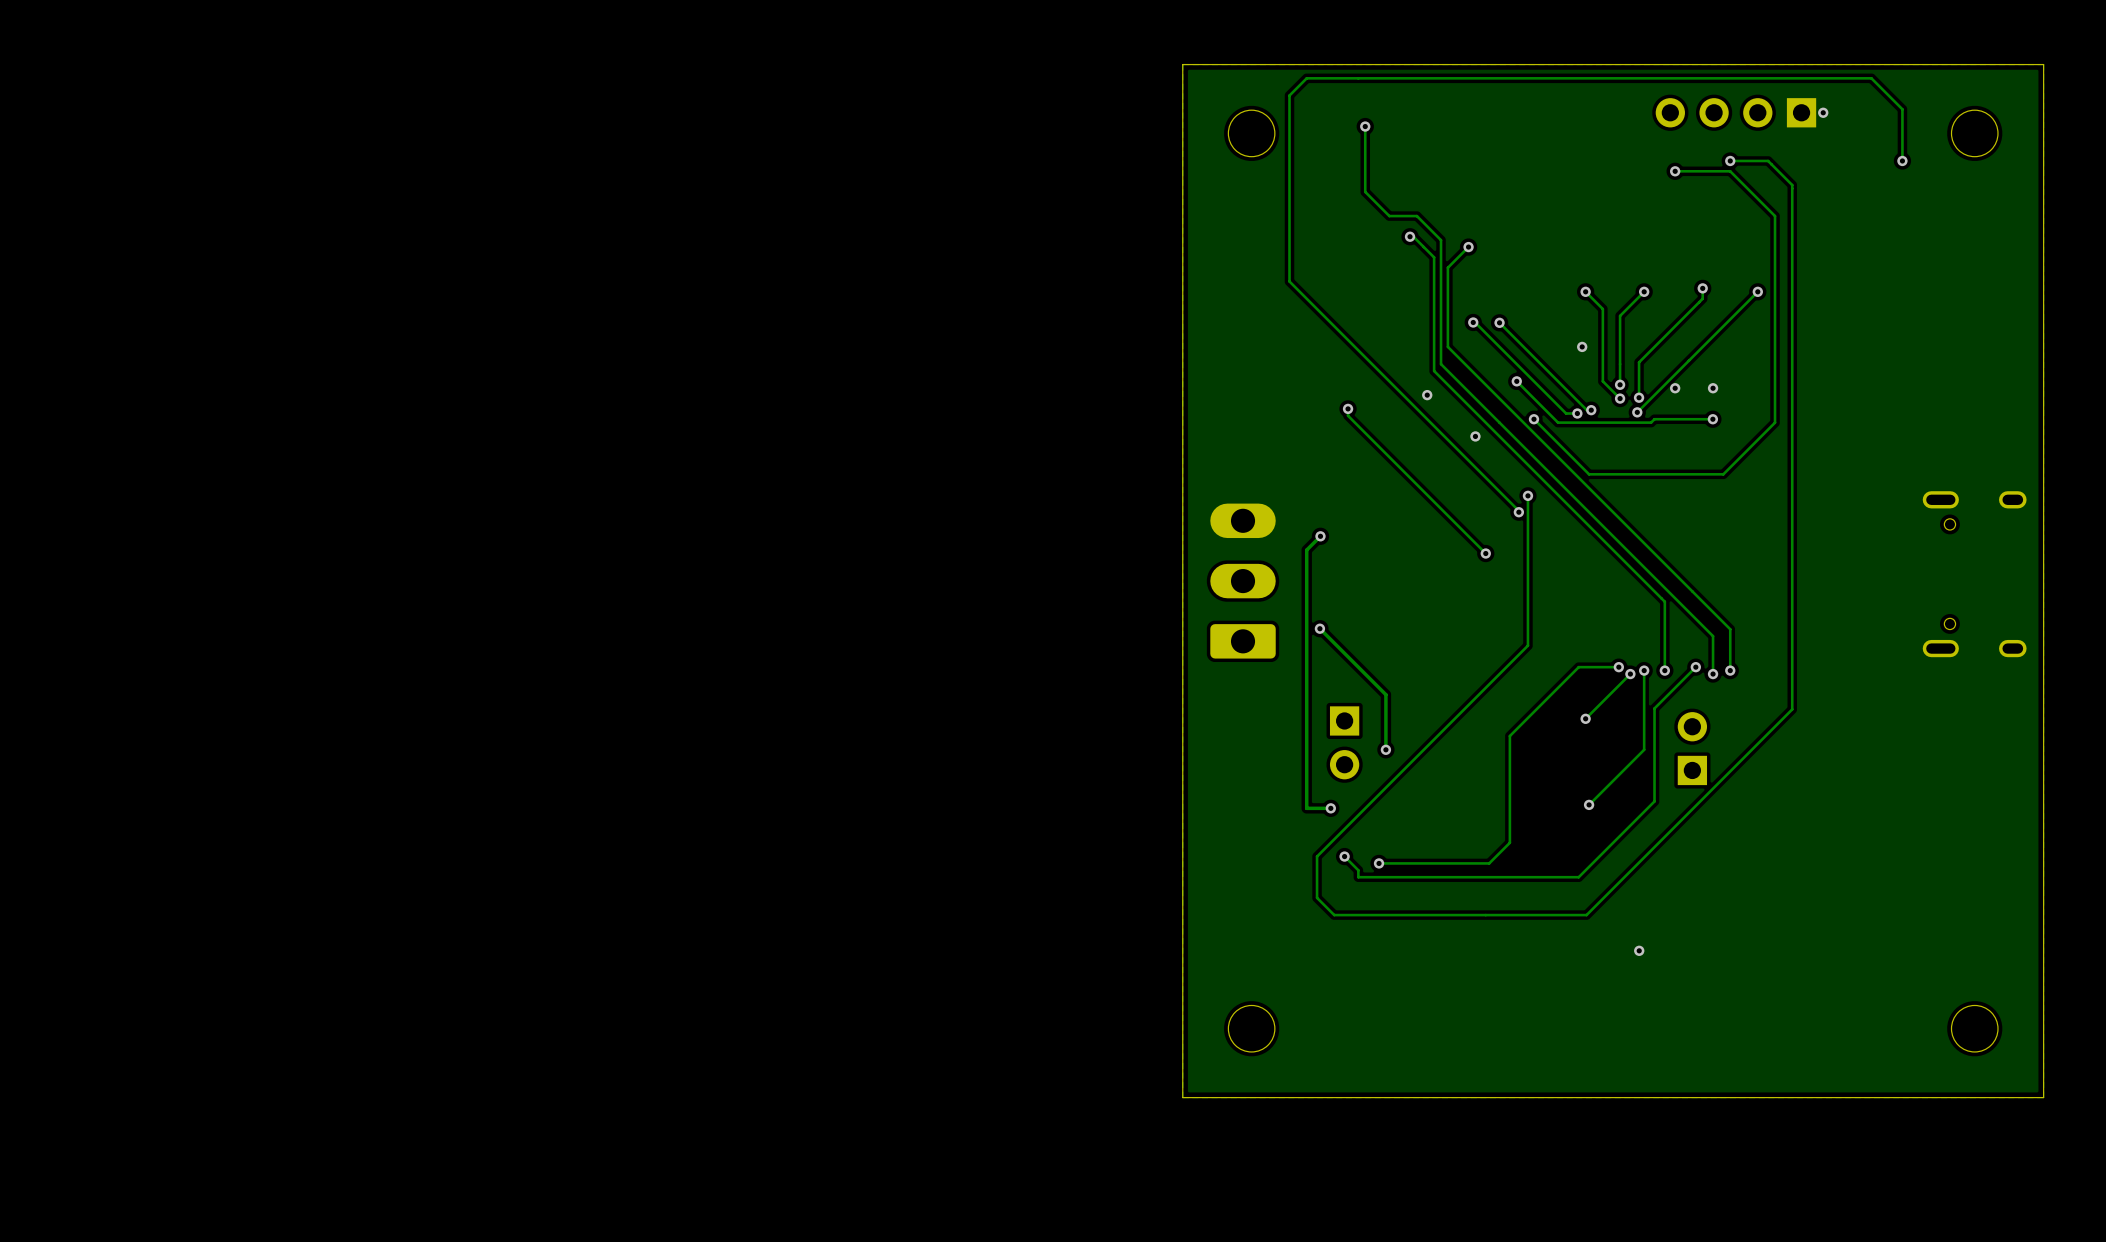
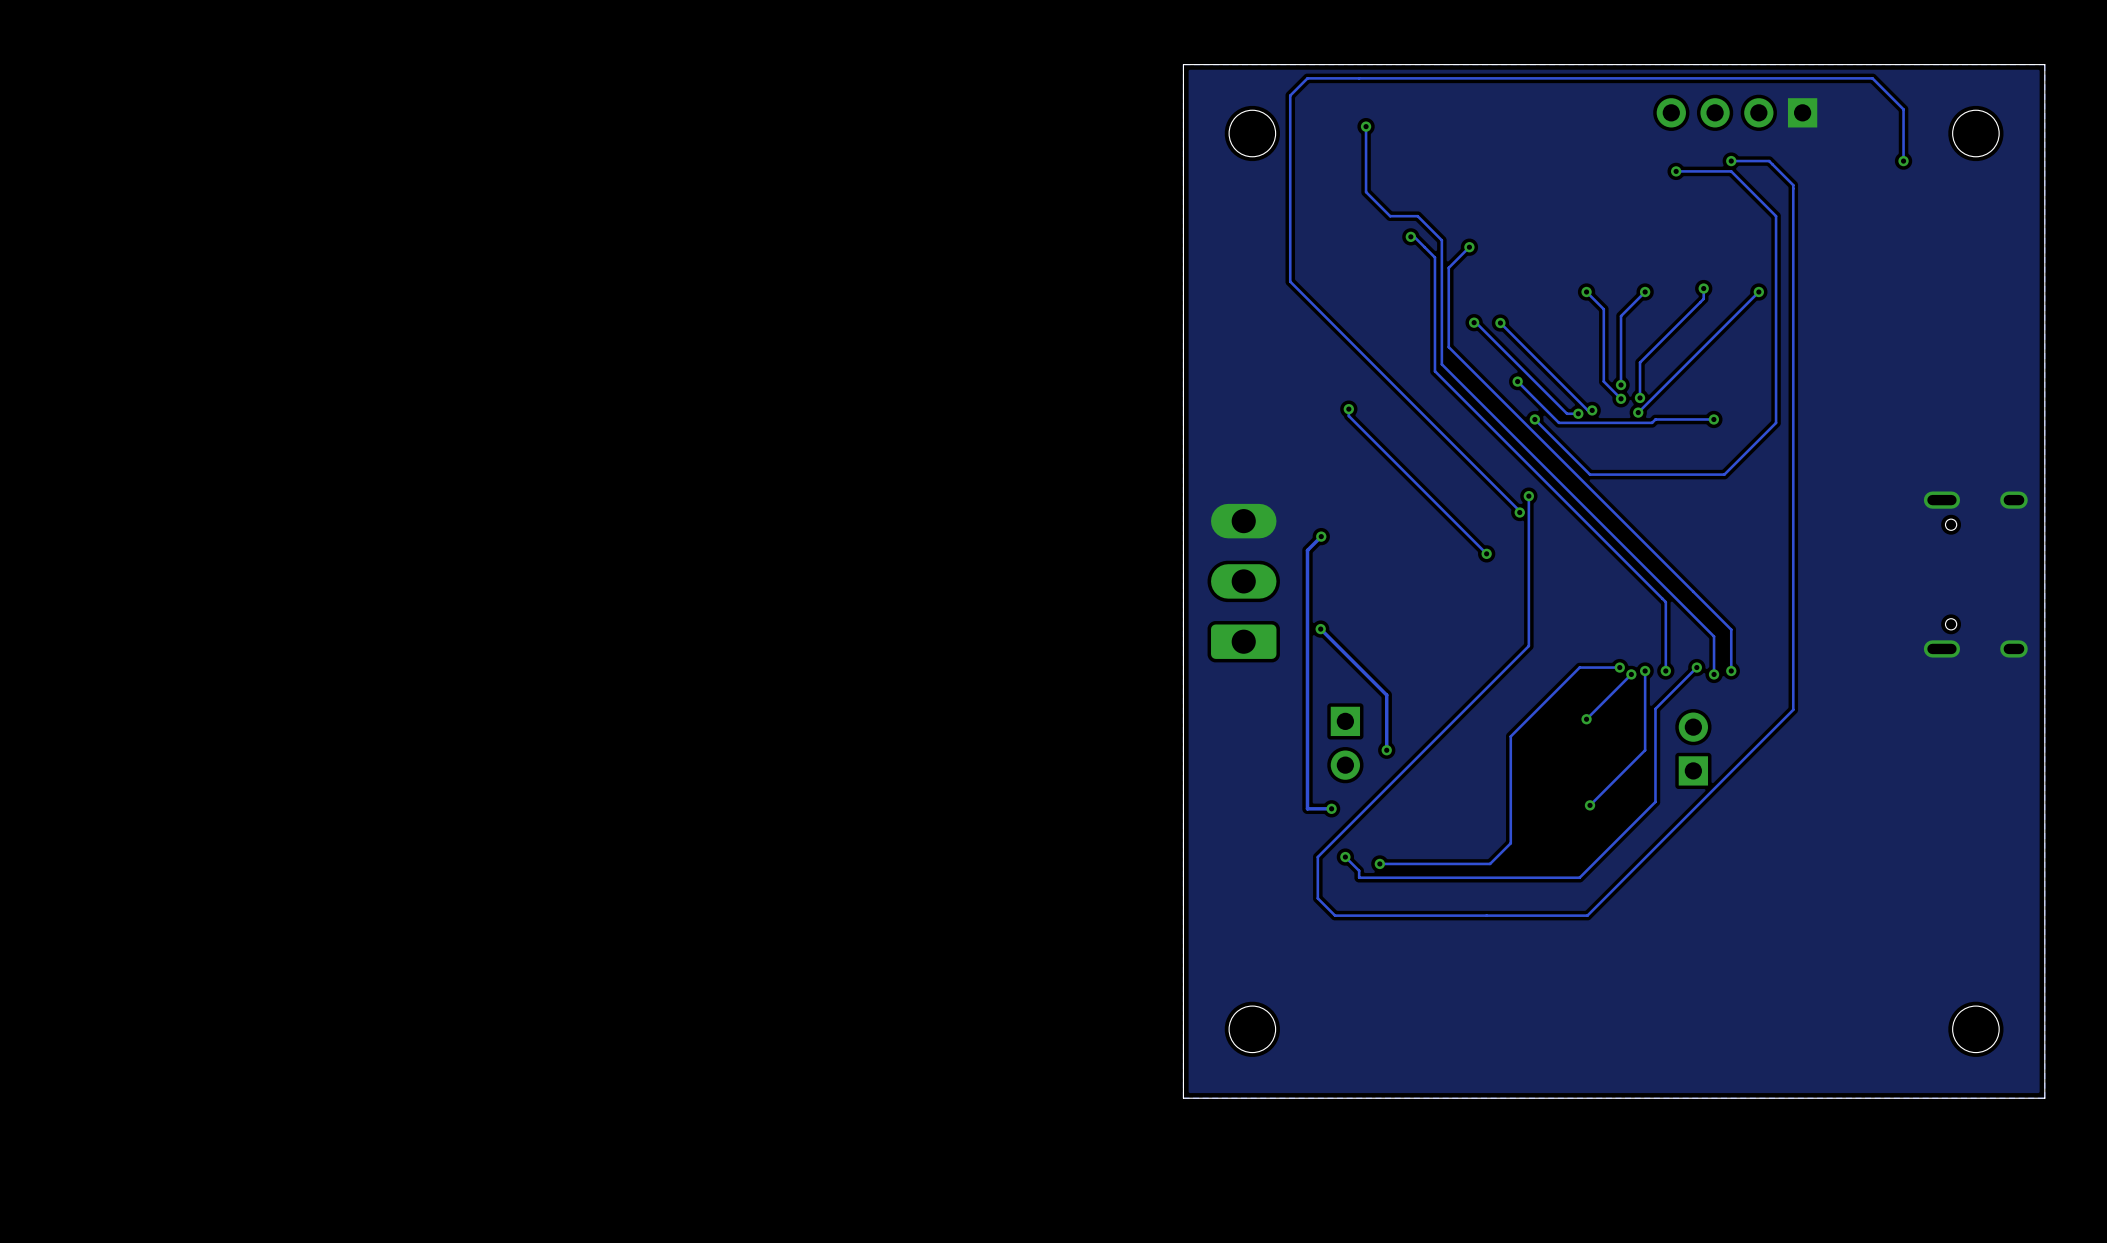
via: (1823, 112) -> none
via: (1582, 346) -> none
via: (1675, 388) -> none
via: (1713, 388) -> none
via: (1427, 395) -> none
via: (1475, 436) -> none
via: (1639, 950) -> none

